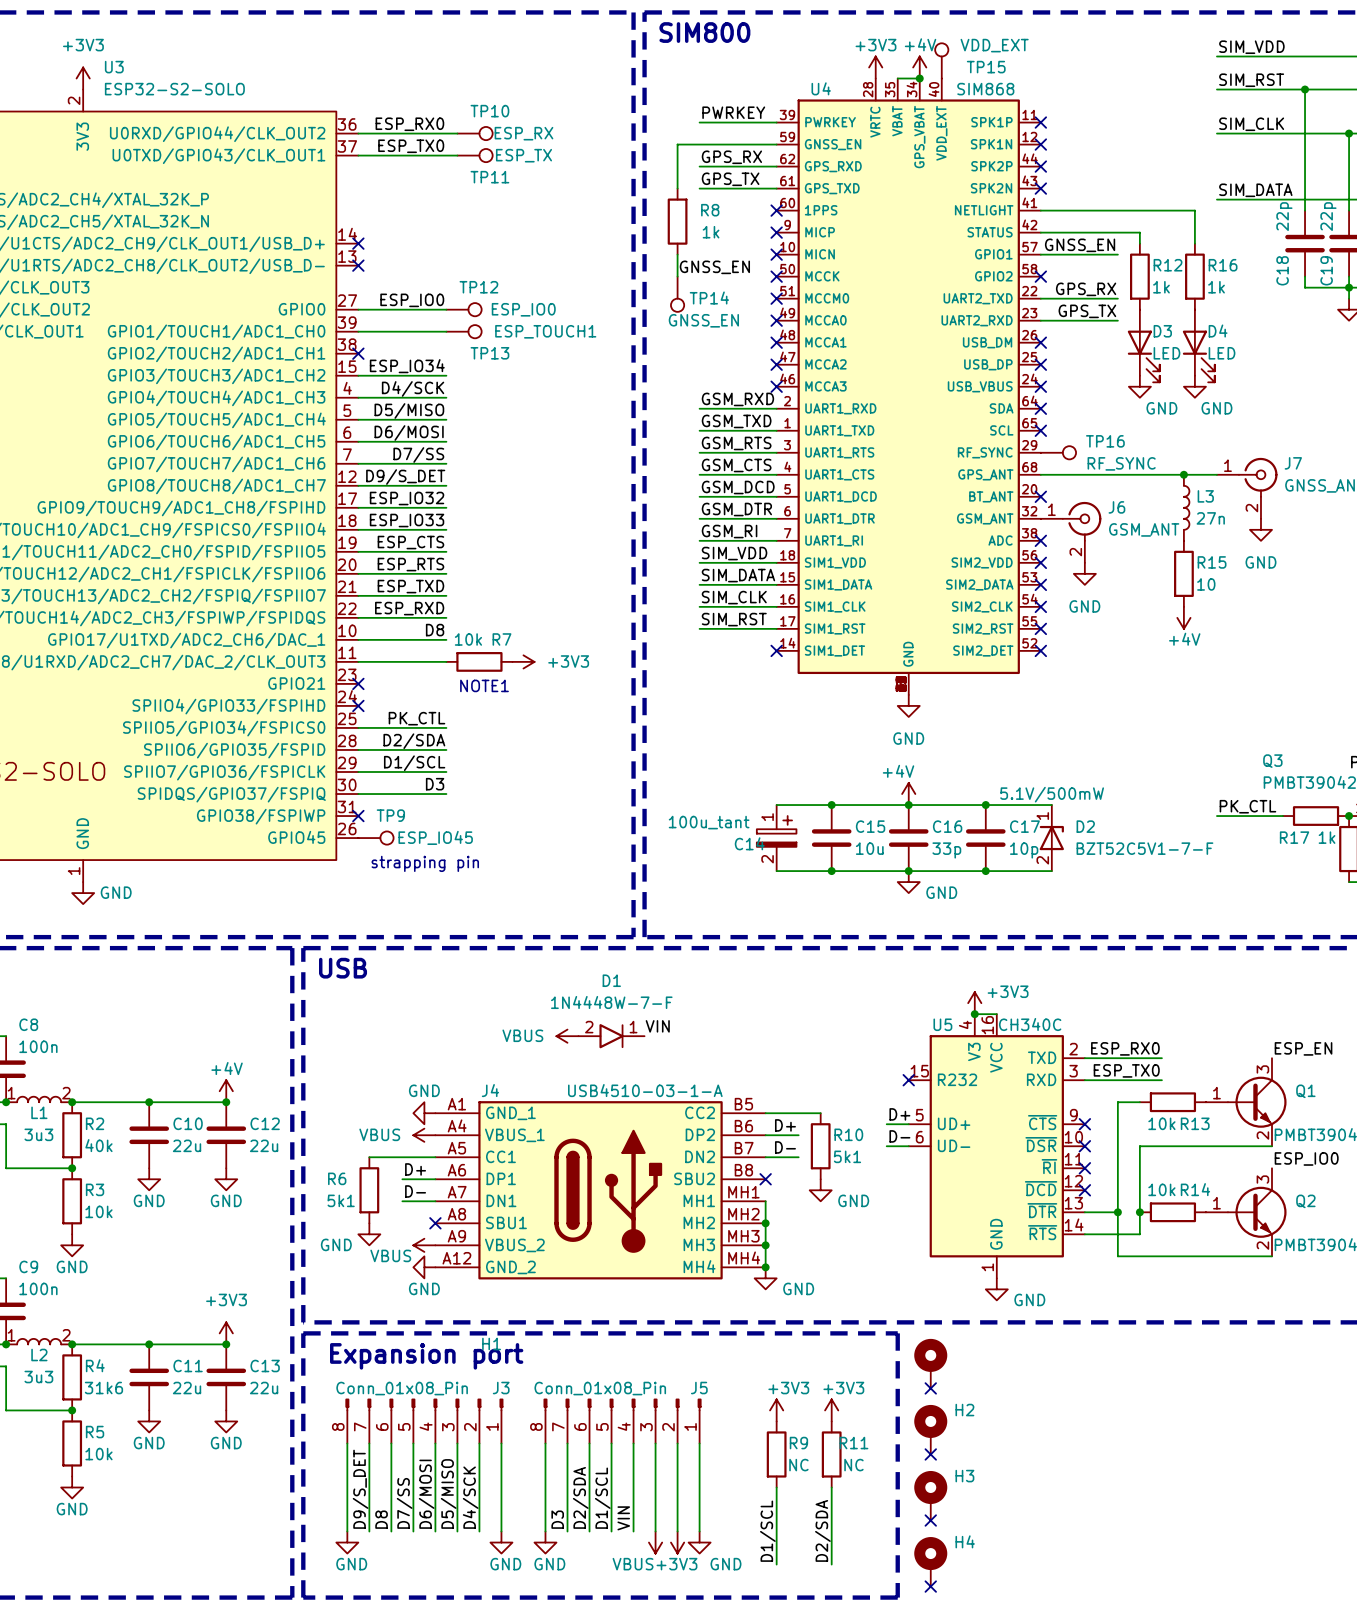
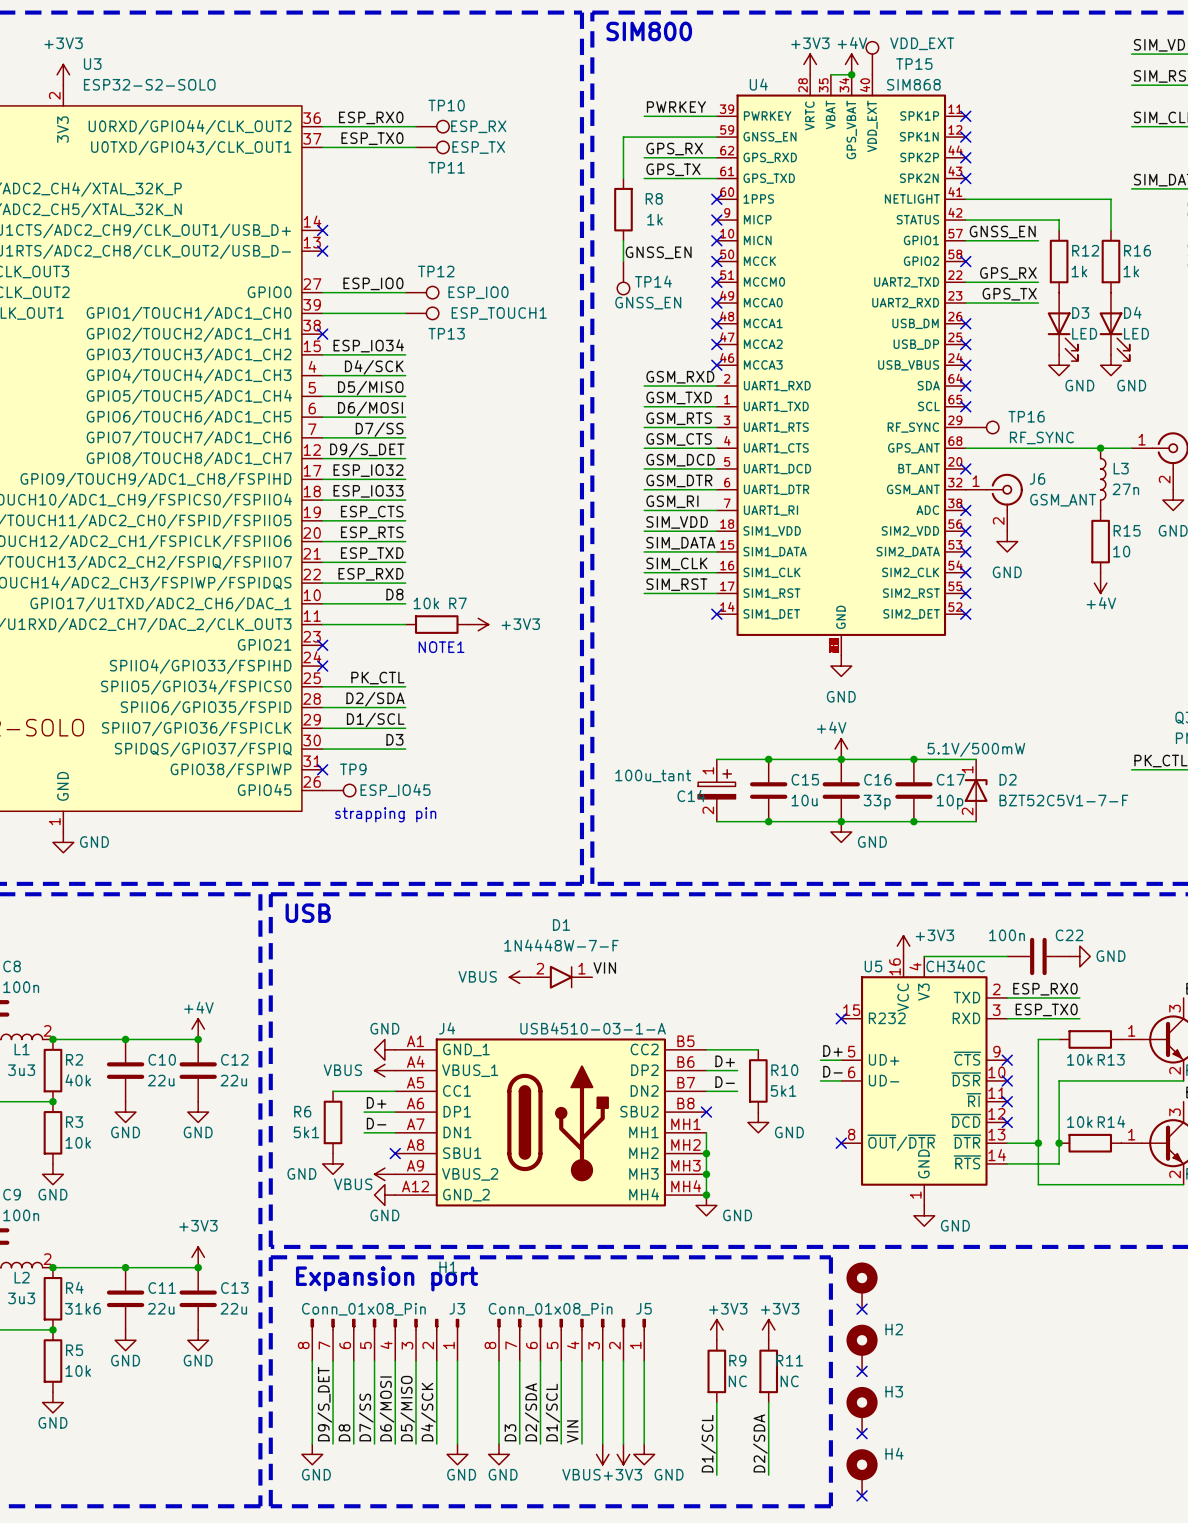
U5 symbol: [908, 1014, 1085, 1279] -> [841, 956, 1008, 1206]
wire: (974, 1014) (996, 1014) -> (1007, 956) (924, 956)
junction: (974, 1014) -> none
C22: none -> 100n (1038, 956)
power symbol: none -> GND (1079, 956)
no-connect mark: none -> (841, 1143)

